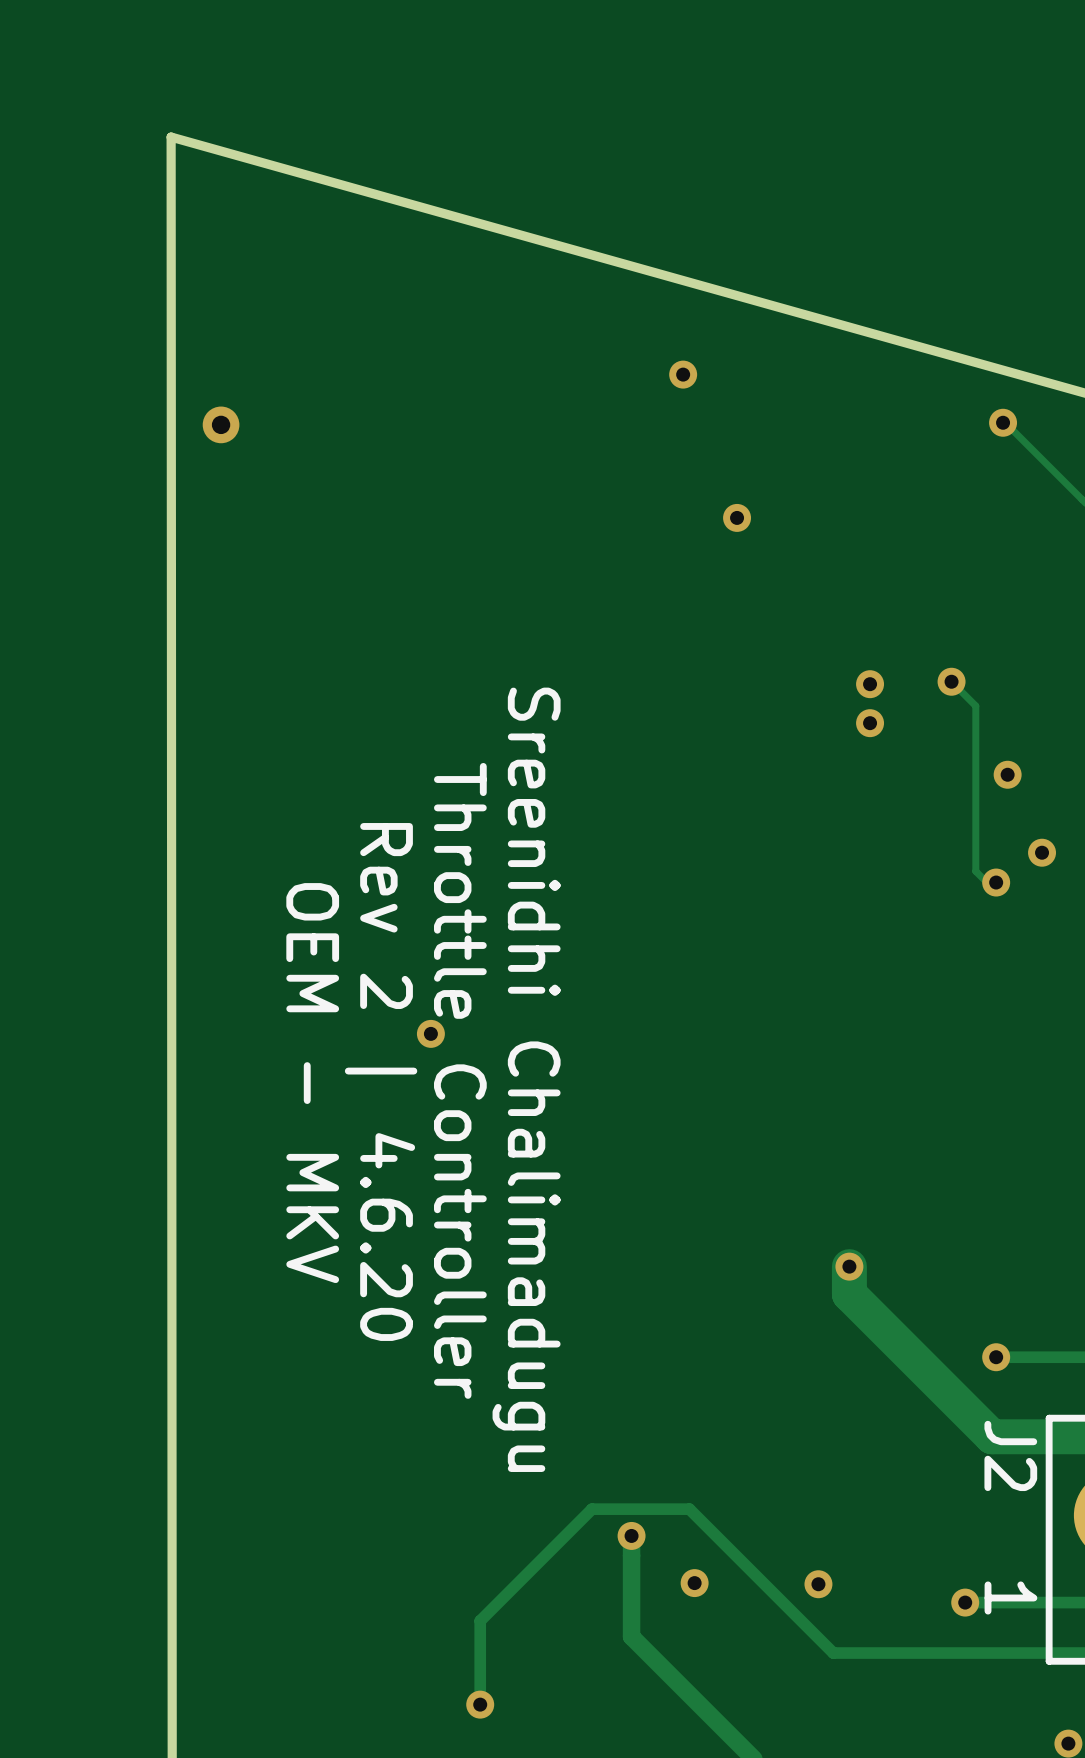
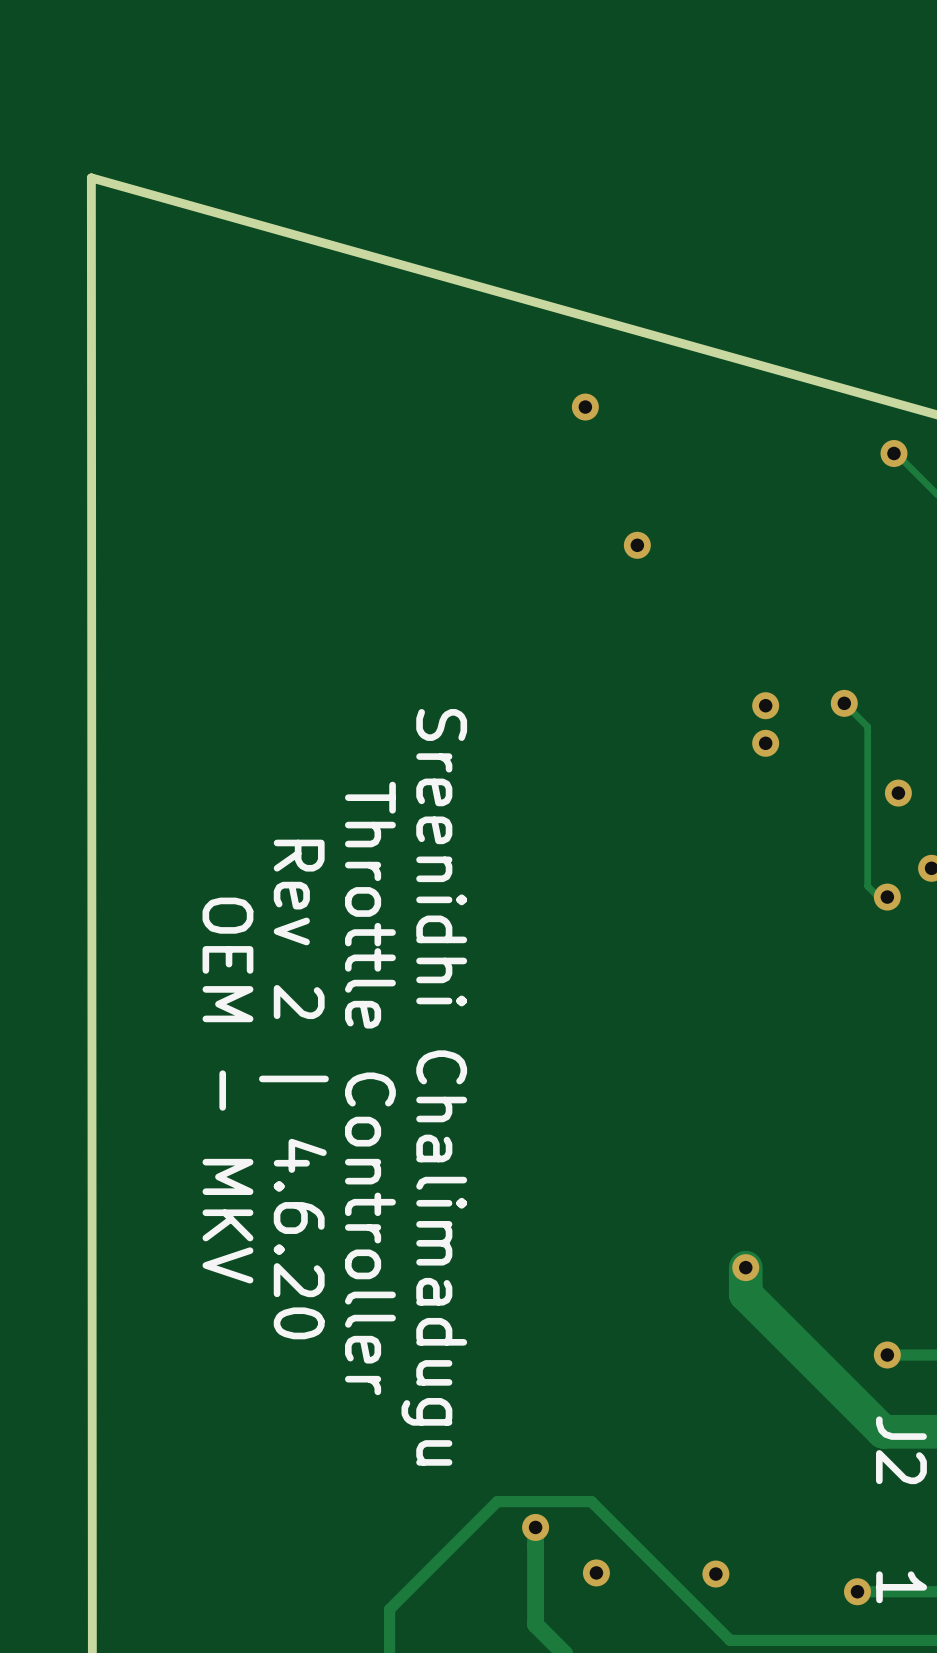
via: (221, 424) -> none
via: (430, 1033) -> none

